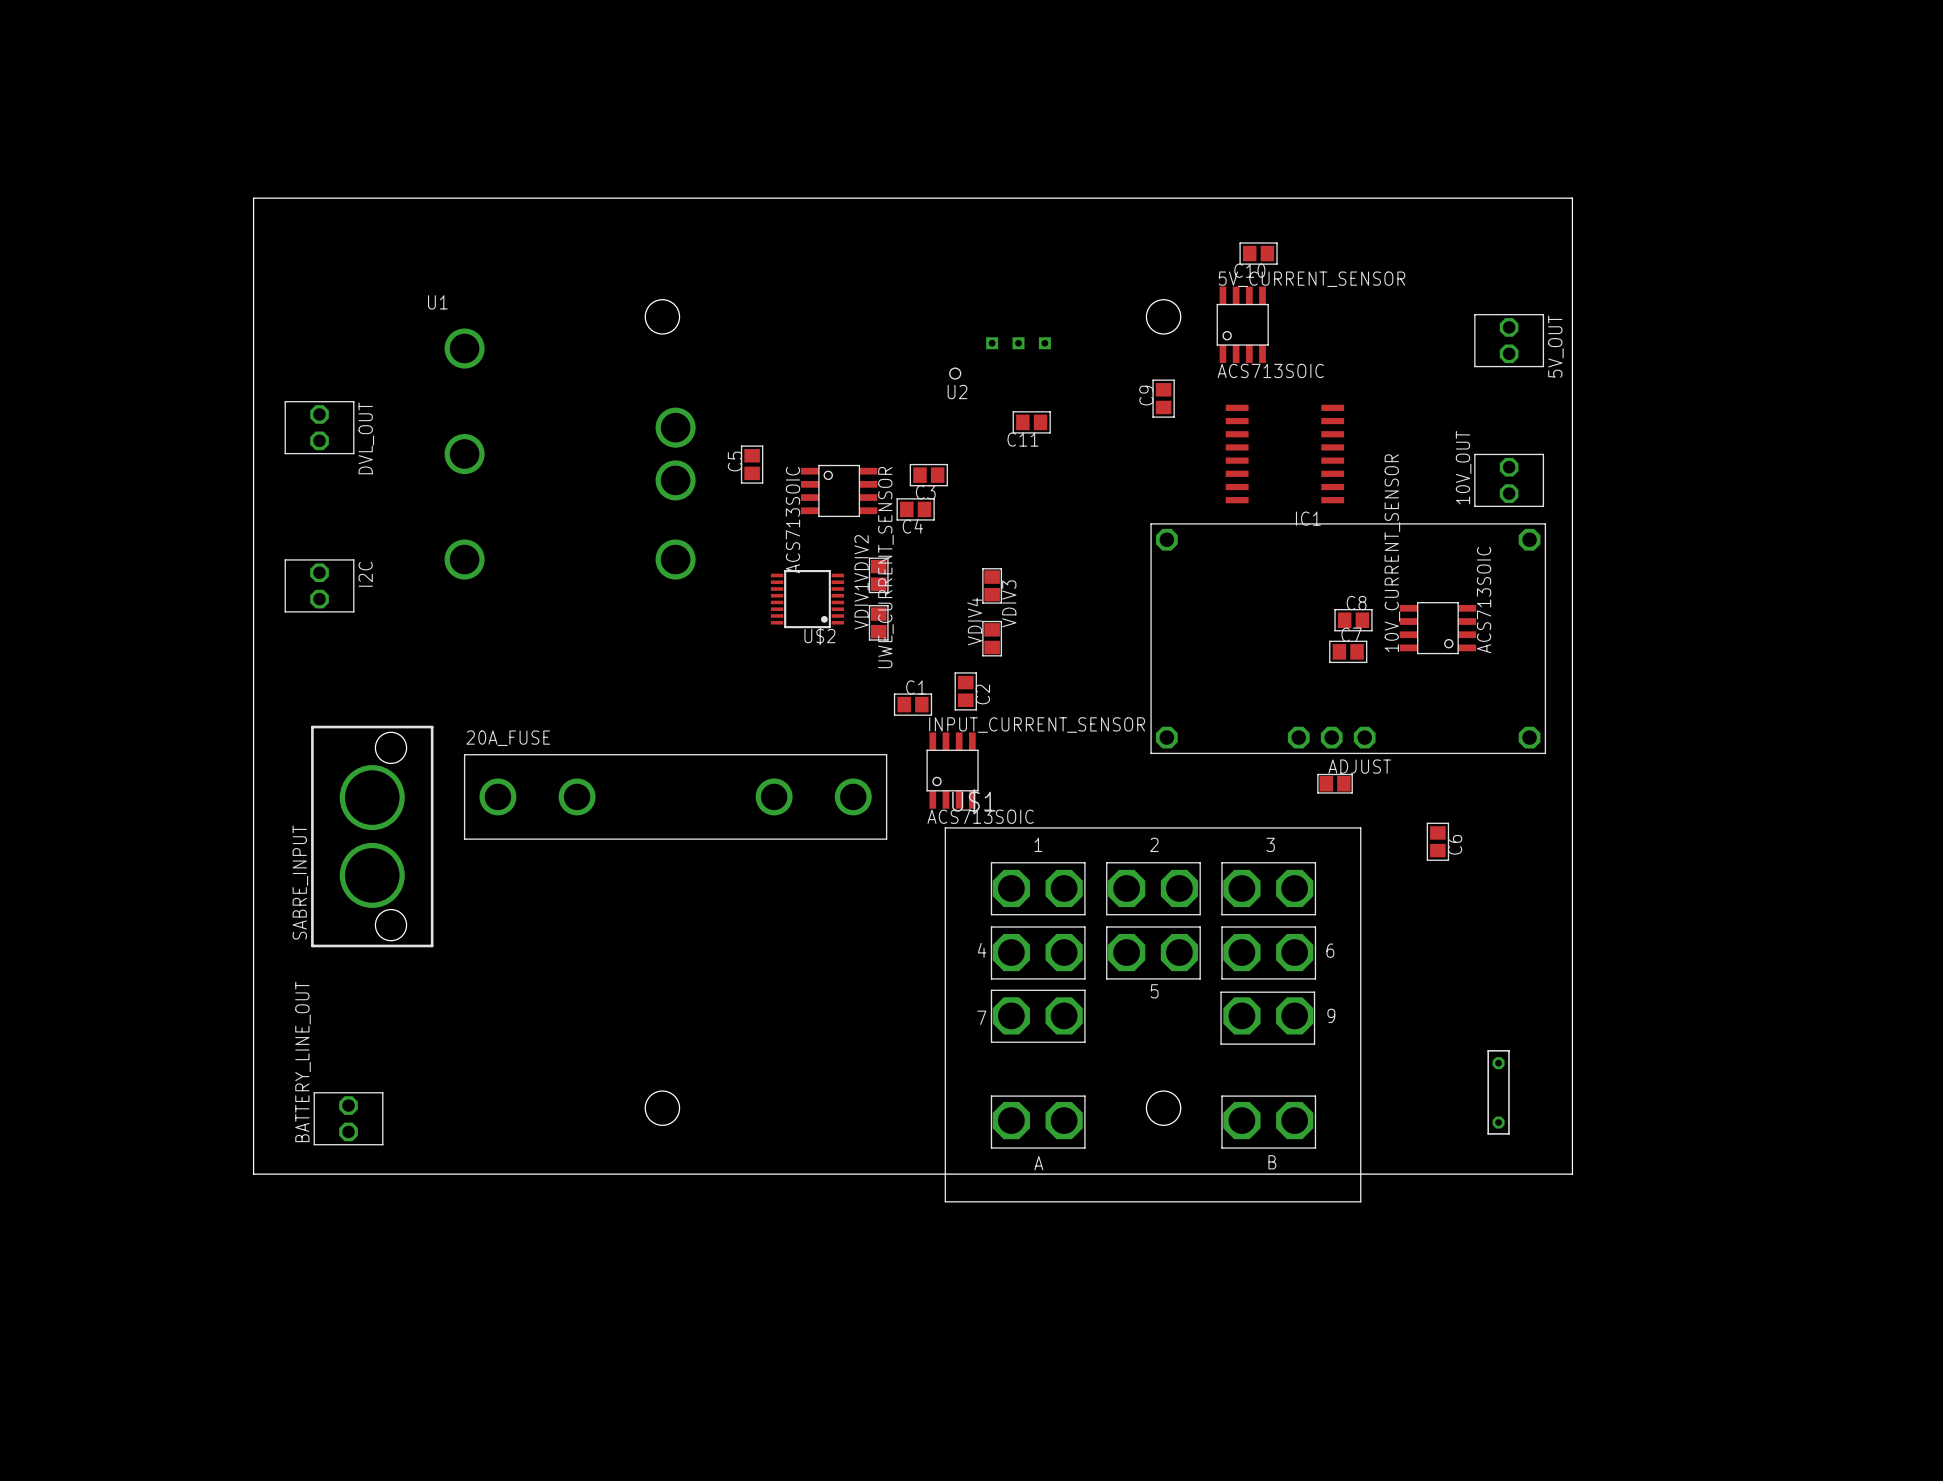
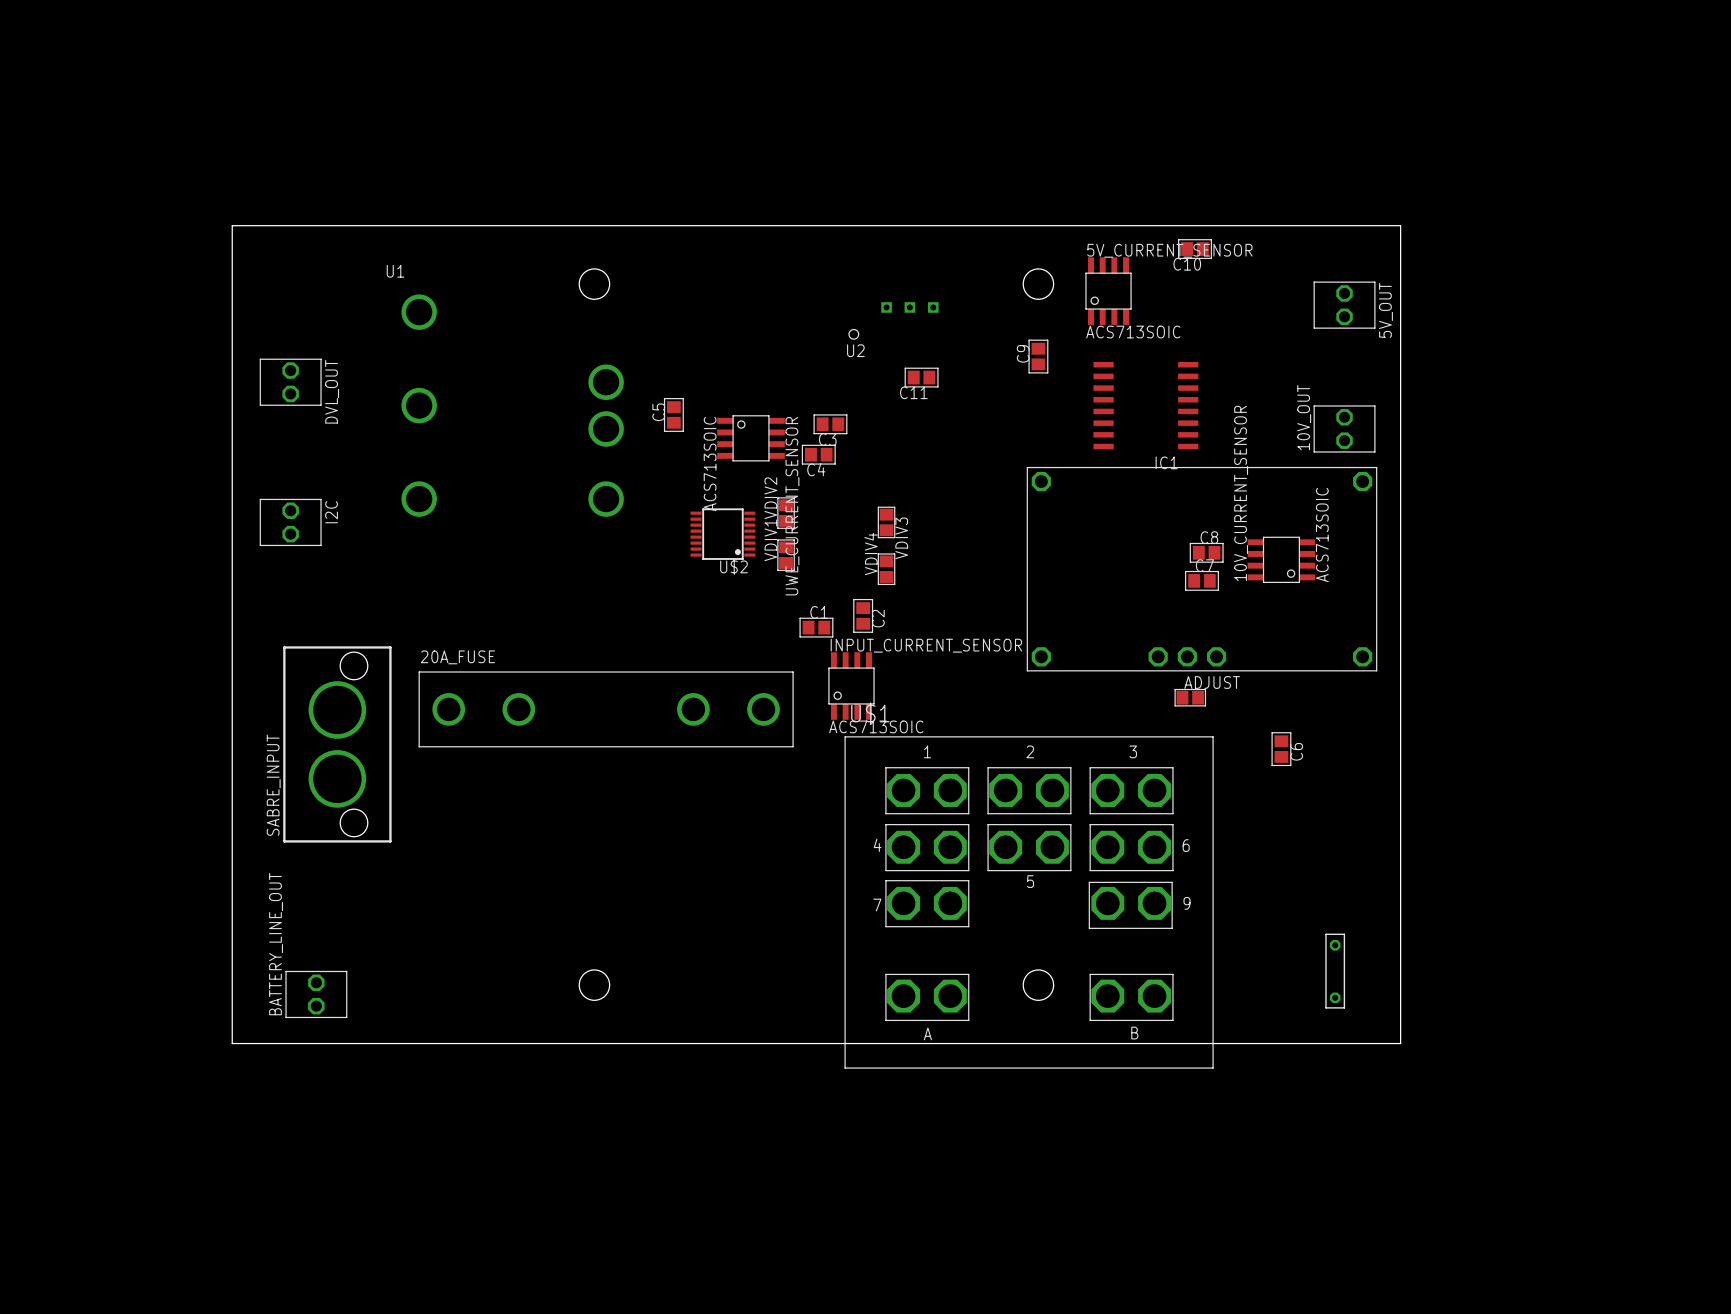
board edge: (253, 250) (253, 198) (1572, 198) (1572, 250) -> (232, 225) (1400, 225)
C10 position: (1258, 253) -> (1194, 249)

